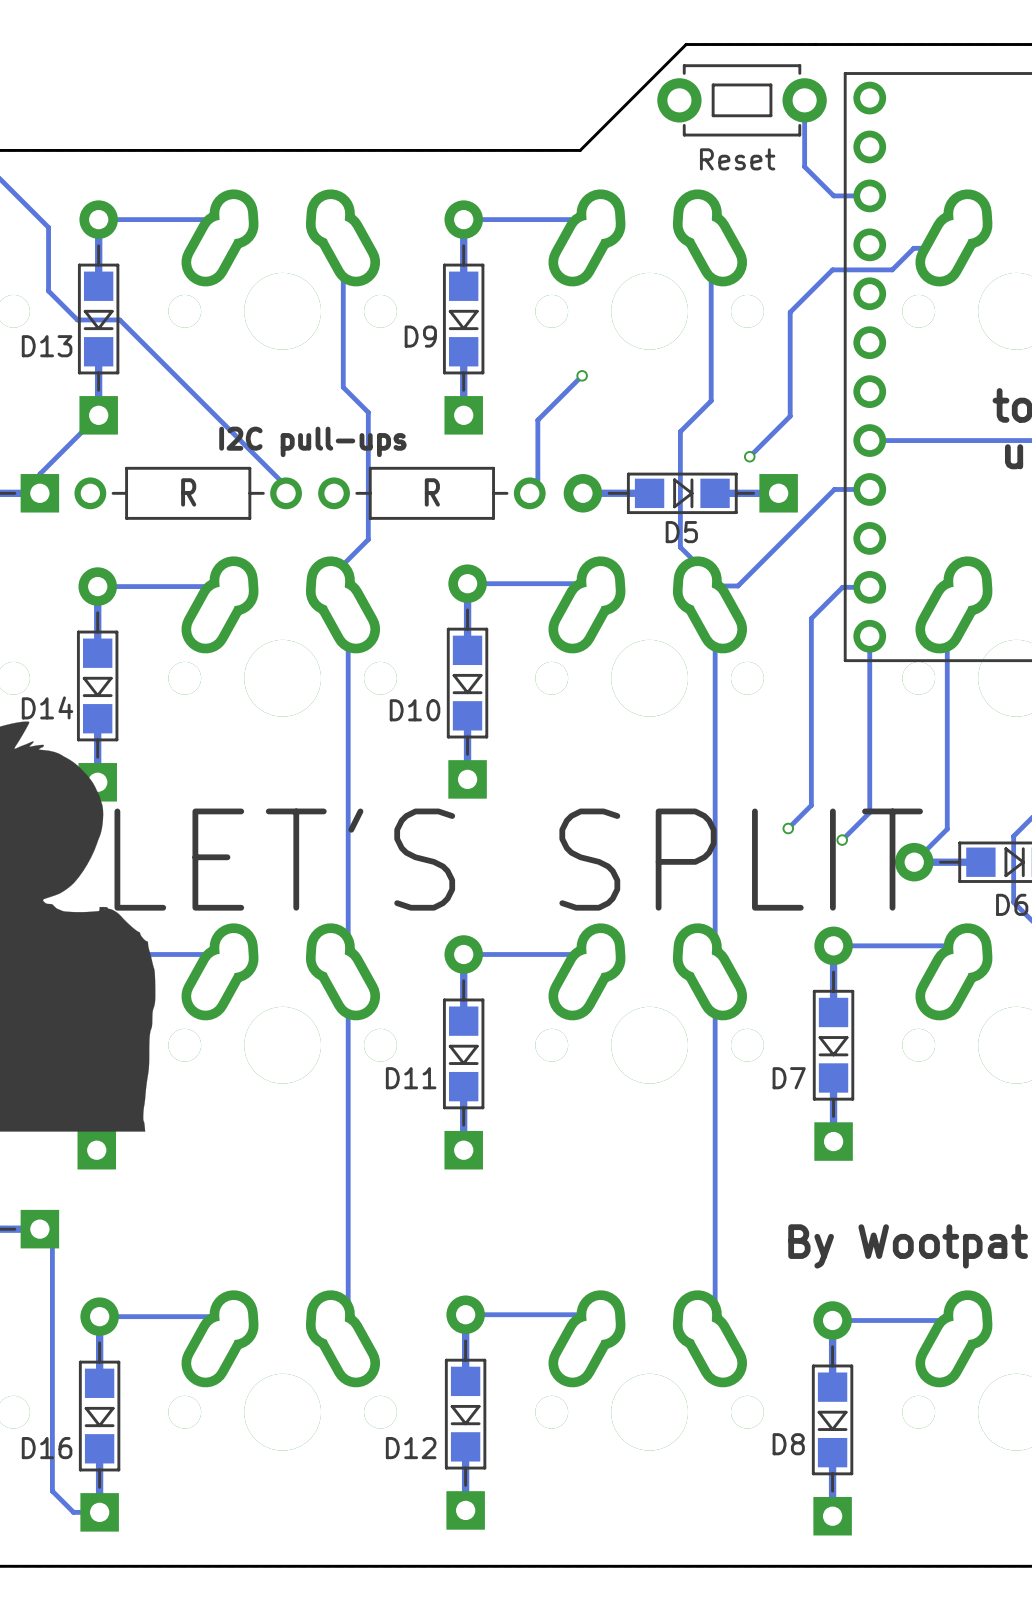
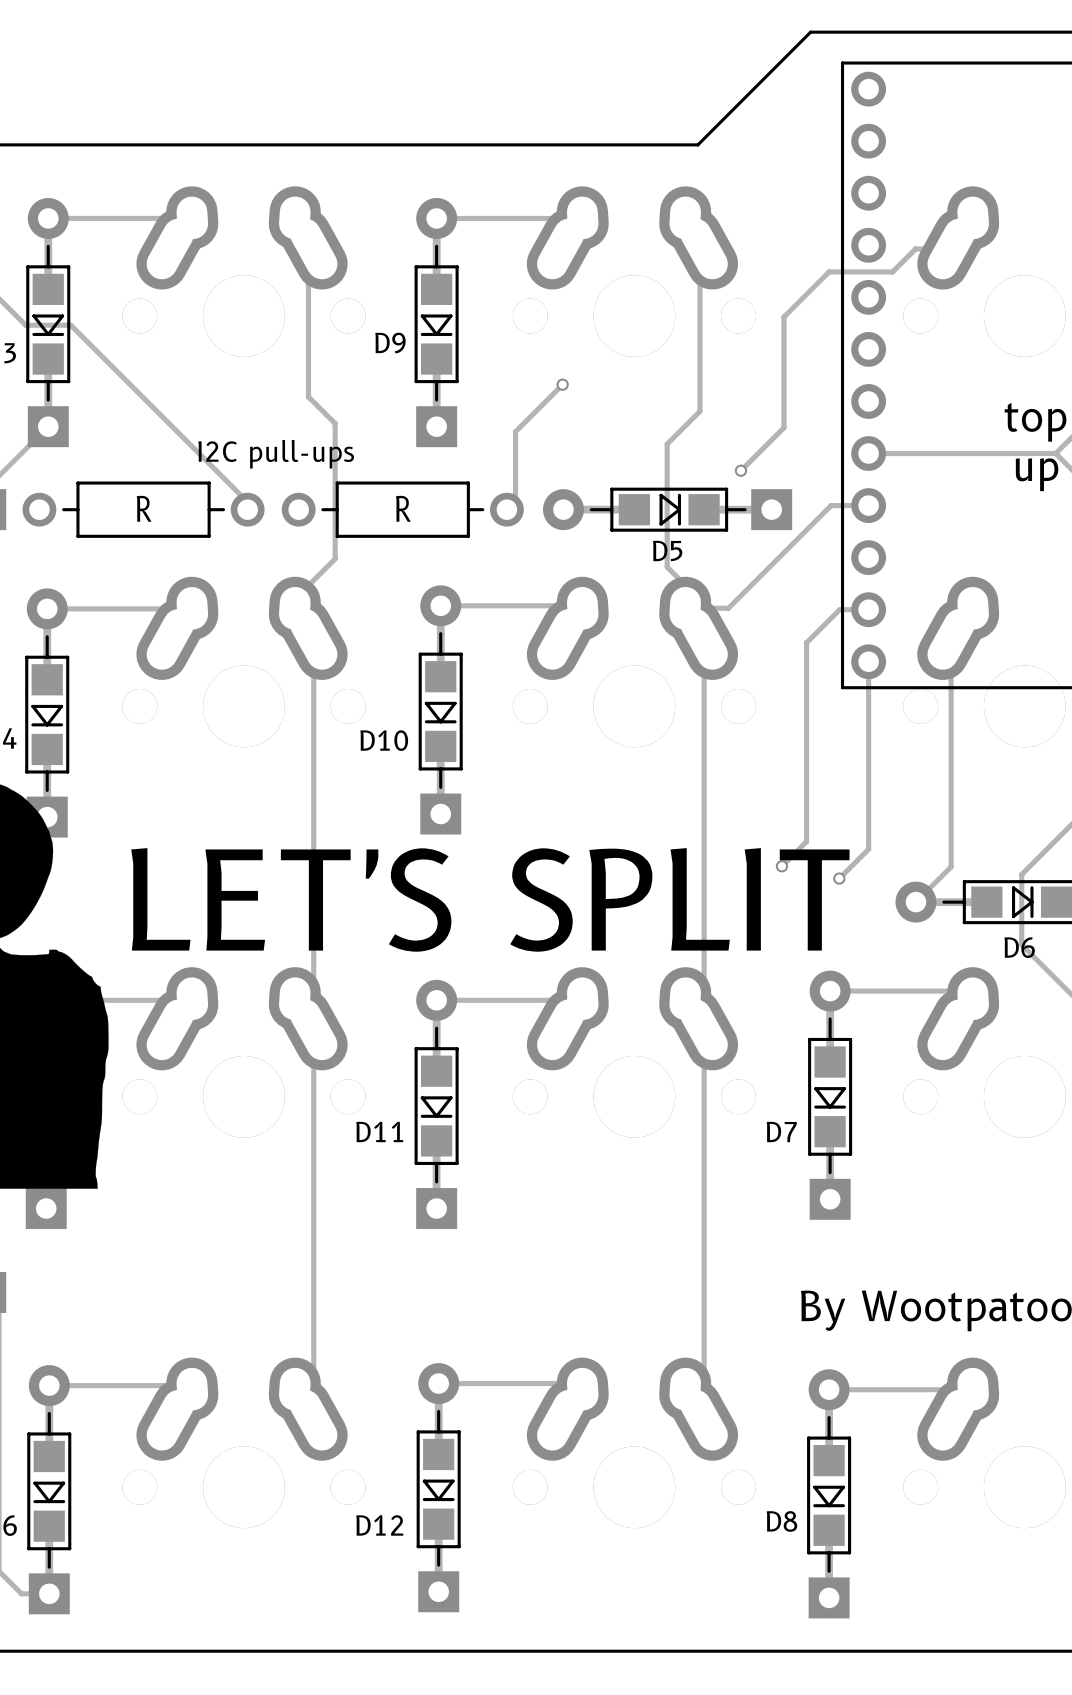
board edge: (815, 44) (686, 44) (580, 150) -> (810, 32) (697, 144) (560, 144)
part: (742, 100) -> none
track: (804, 100) (804, 166) (833, 195) (869, 195) -> none
text: Reset (737, 159) -> none

